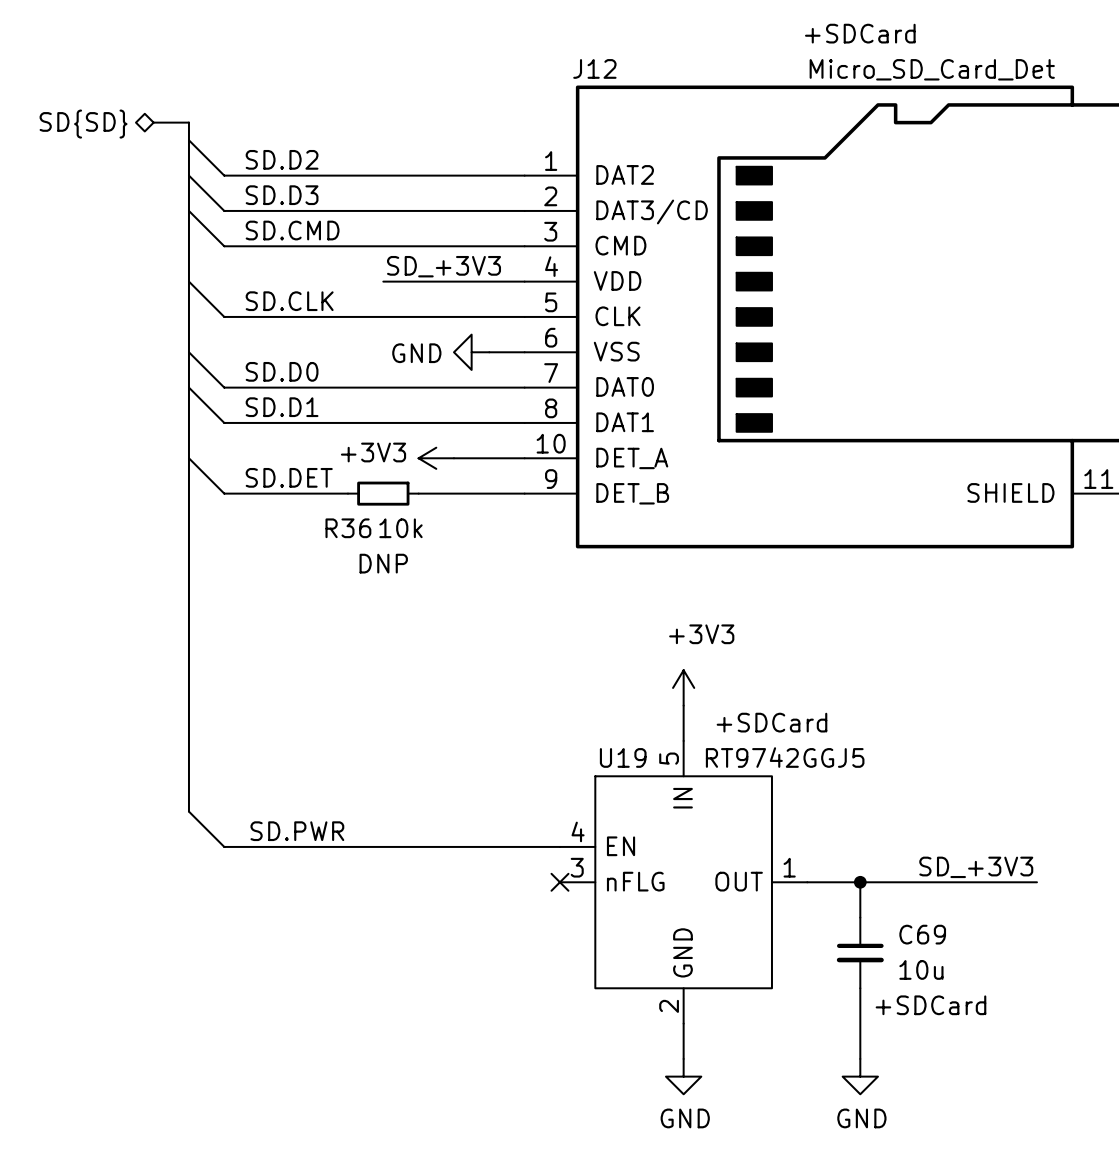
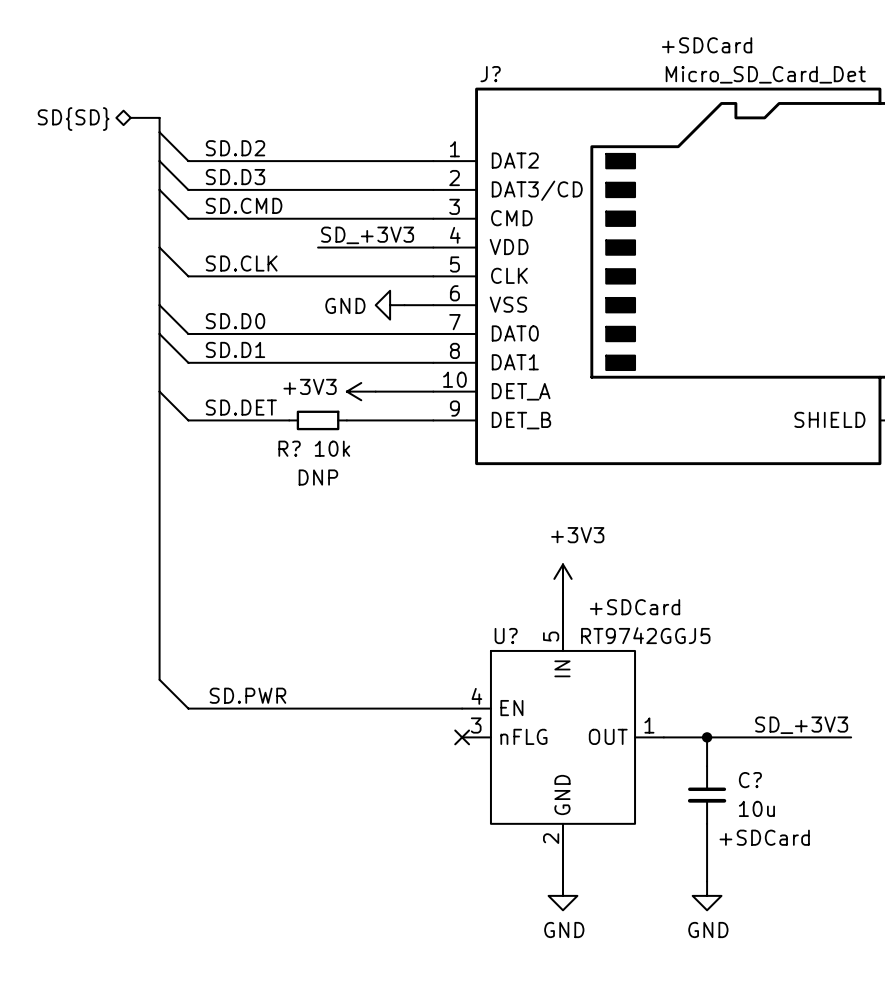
J12 name: J12 (594, 68) -> J? (490, 74)
R36 name: R36 (348, 528) -> R? (289, 448)
U19 name: U19 (623, 757) -> U? (506, 636)
C69 name: C69 (922, 934) -> C? (750, 780)

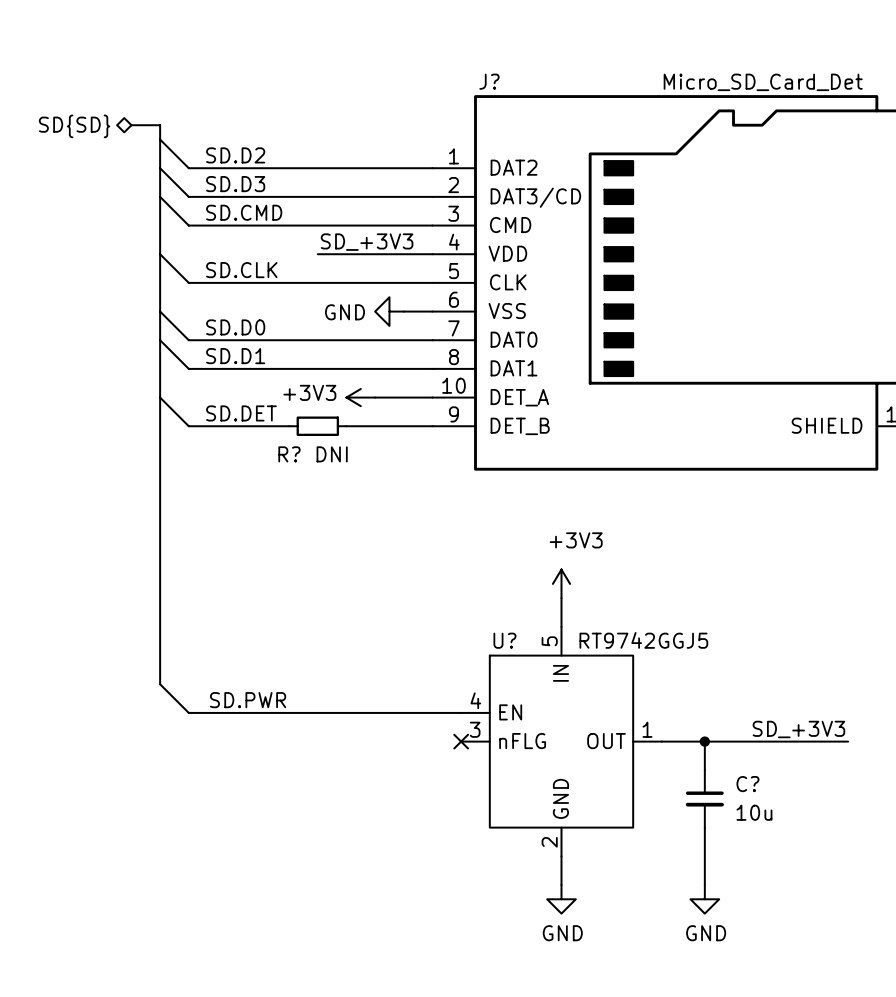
J? text: +SDCard (707, 45) -> none
R? value: 10k (332, 448) -> DNI (332, 454)
R? text: DNP (318, 477) -> none
U? text: +SDCard (635, 607) -> none
C? text: +SDCard (764, 837) -> none

